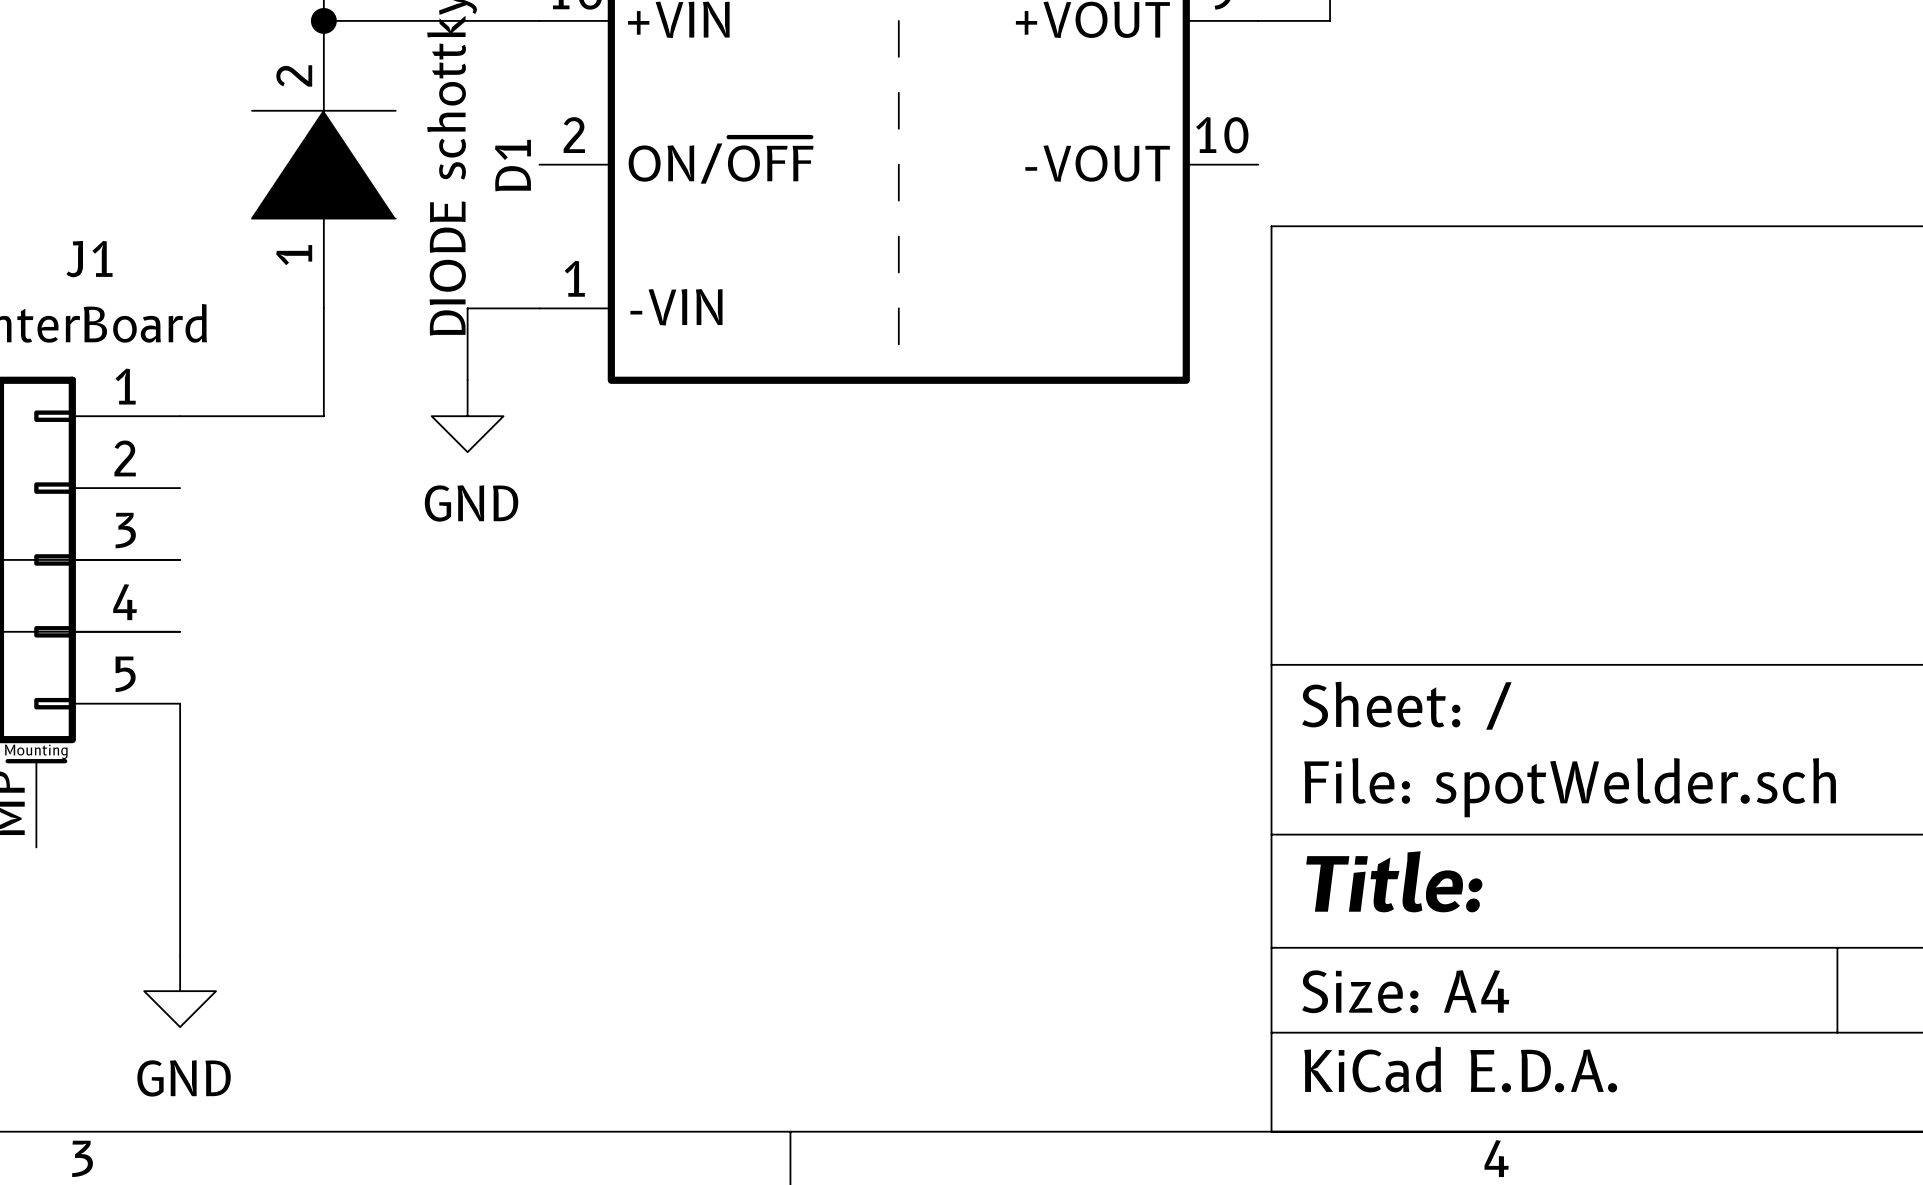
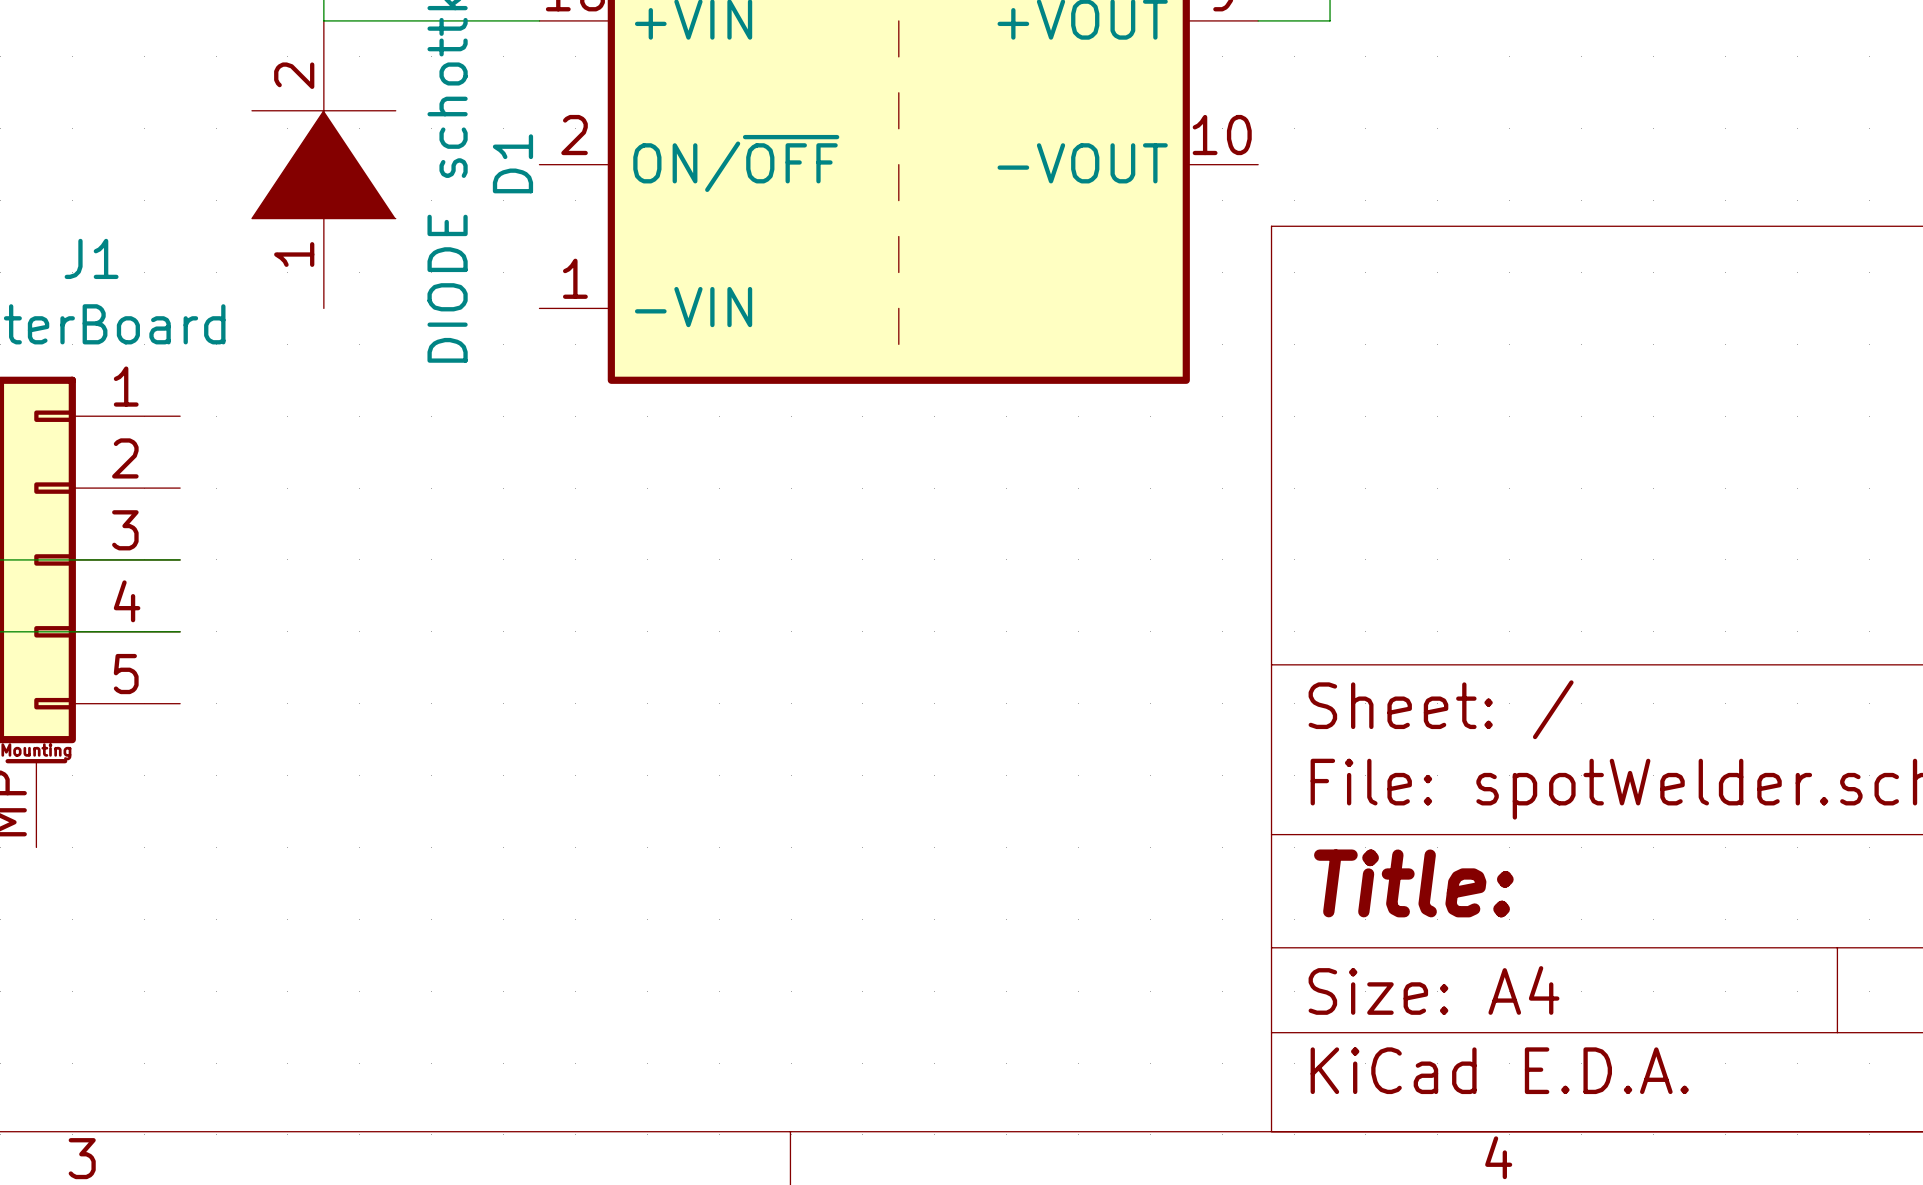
junction: (323, 20) -> none
wire: (323, 308) (323, 416) (180, 416) -> none
wire: (539, 308) (467, 308) (467, 380) -> none
power symbol: GND (467, 416) -> none
wire: (180, 703) (180, 955) -> none
power symbol: GND (180, 991) -> none

